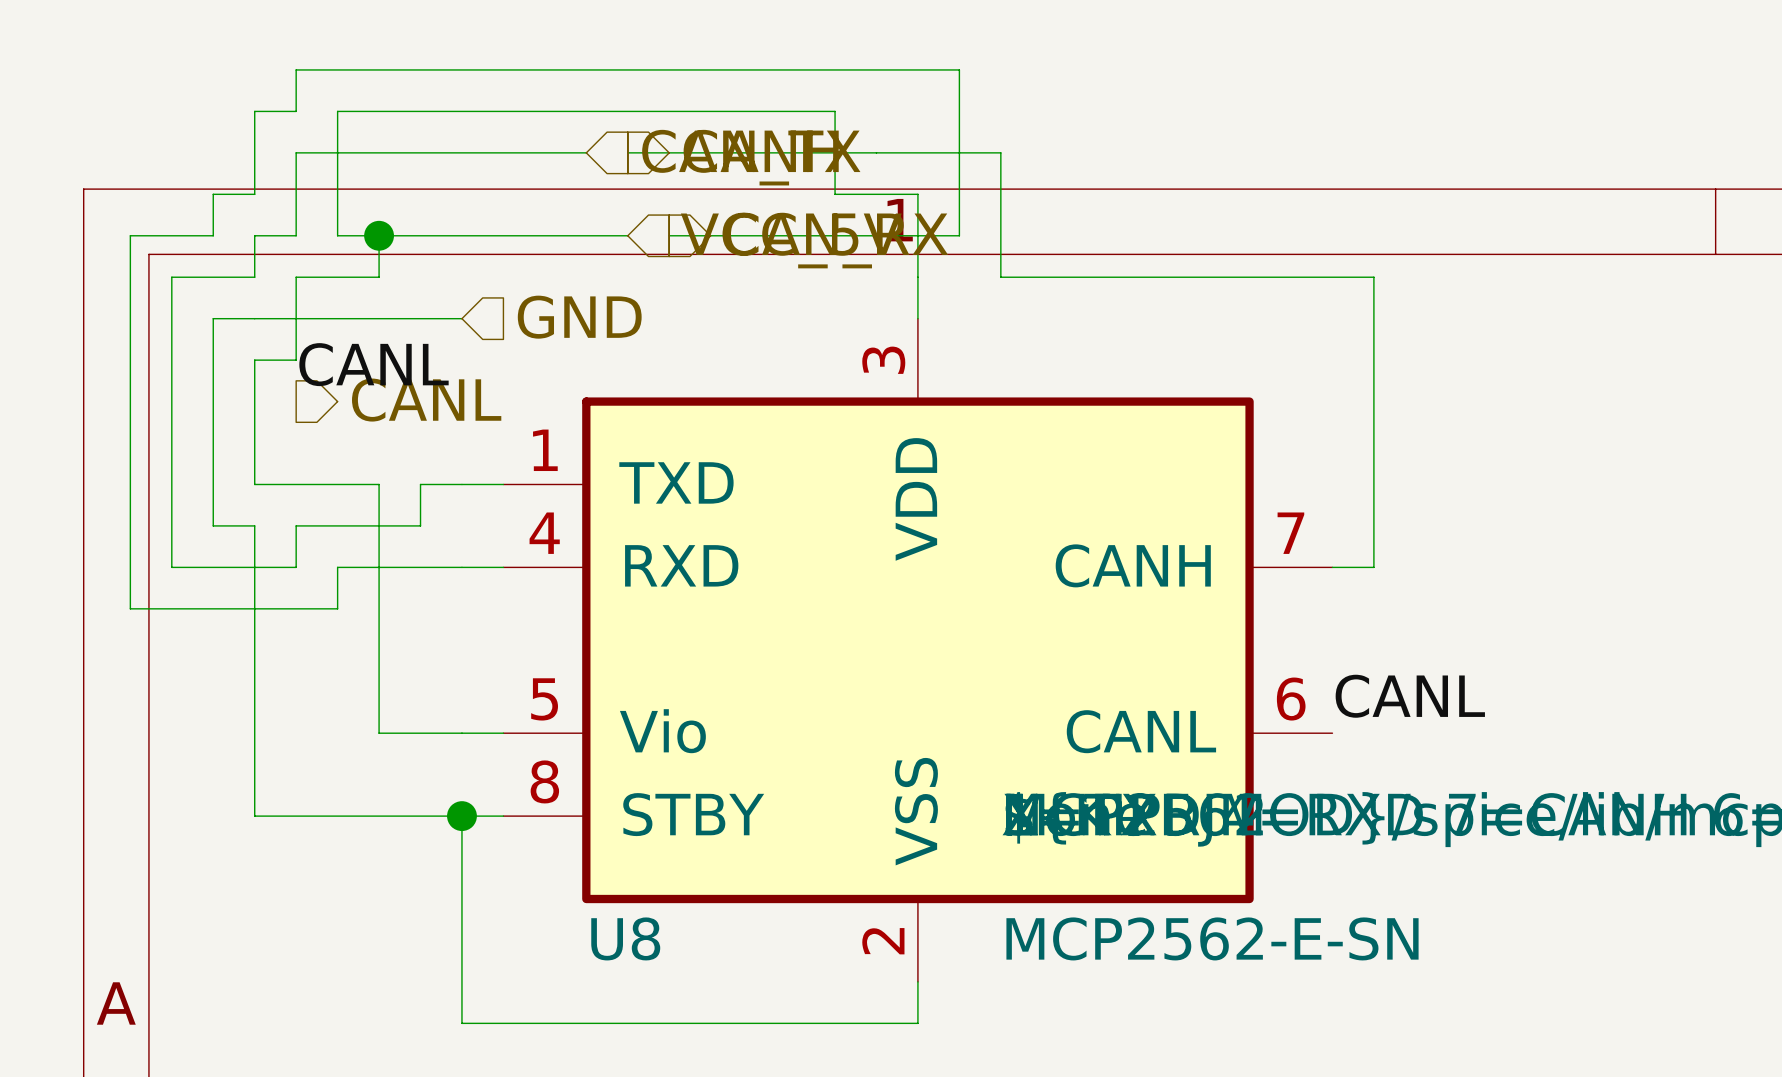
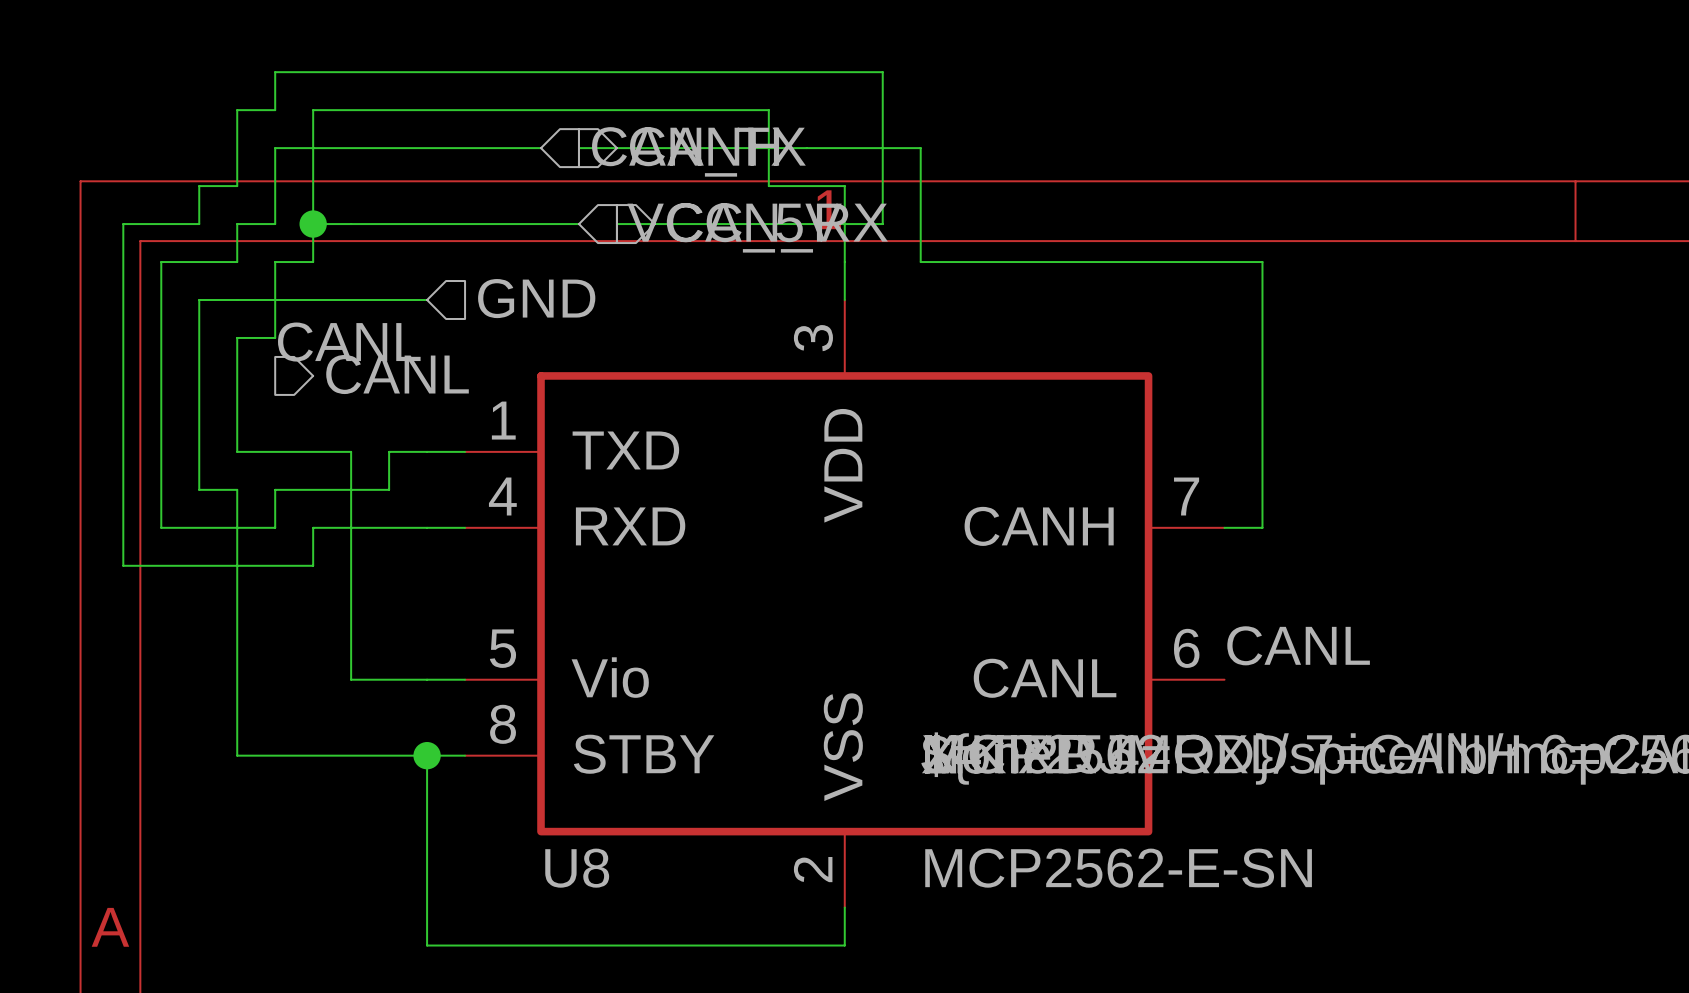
wire: (379, 235) (379, 277) (337, 277) -> (313, 224) (313, 262)
junction position: (379, 235) -> (313, 224)

